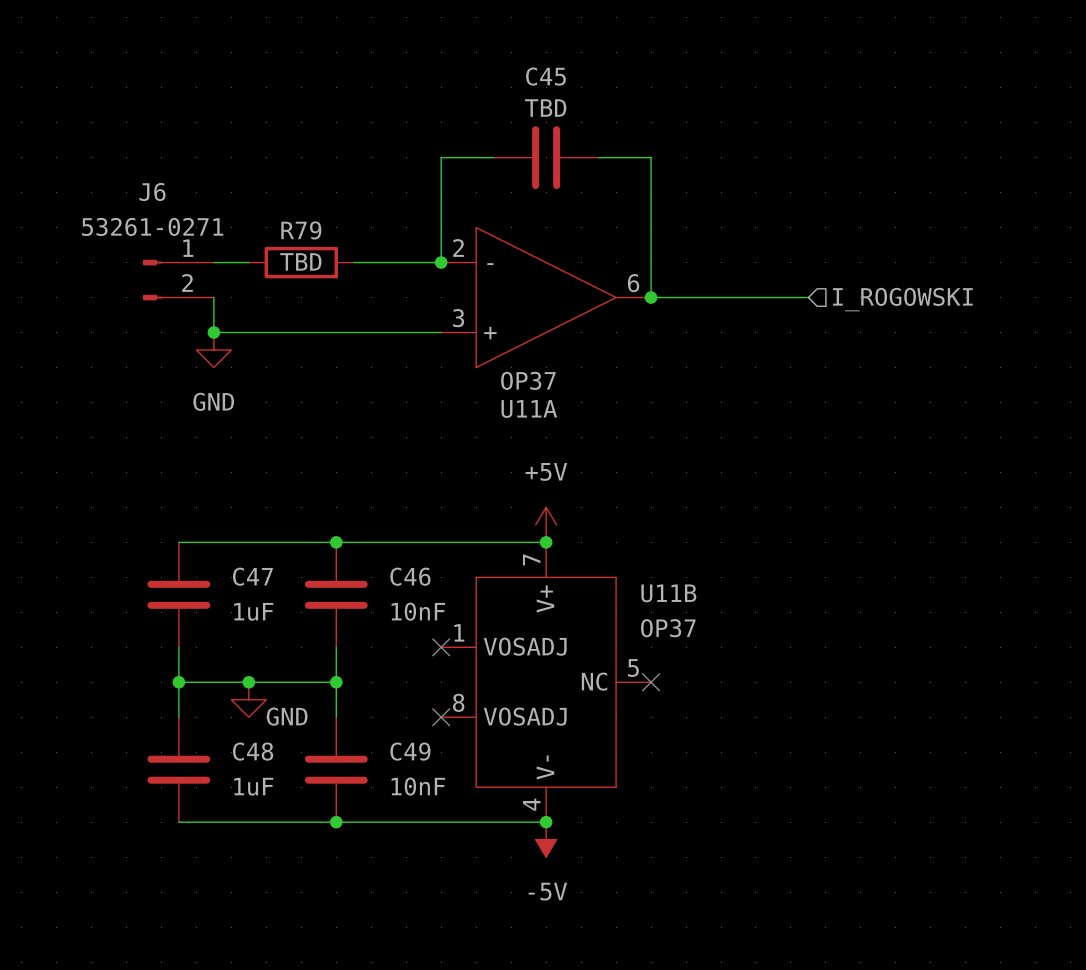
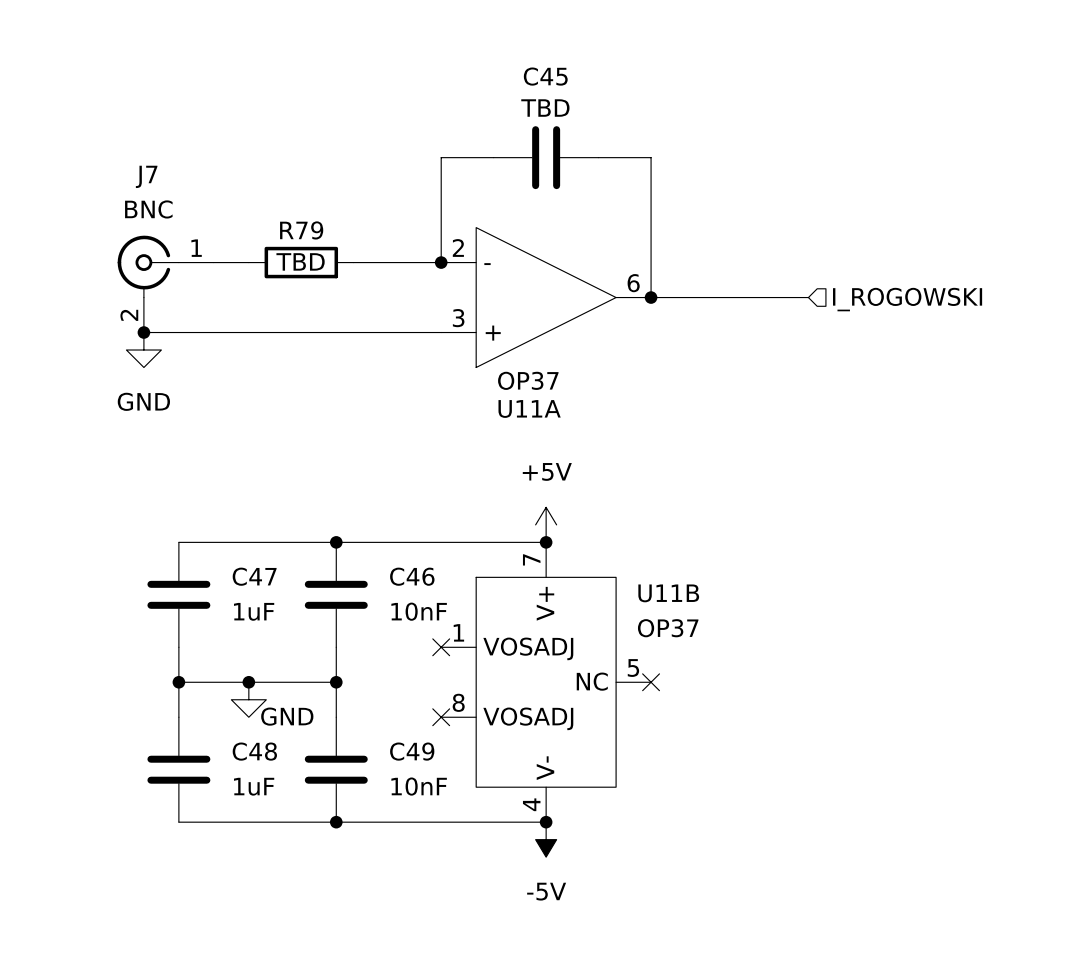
J6: 53261-0271 (178, 280) -> none
J7: none -> BNC (165, 284)
wire: (213, 297) (213, 332) -> (143, 332) (213, 332)
junction position: (213, 332) -> (143, 332)
power symbol position: GND (213, 350) -> GND (143, 350)

